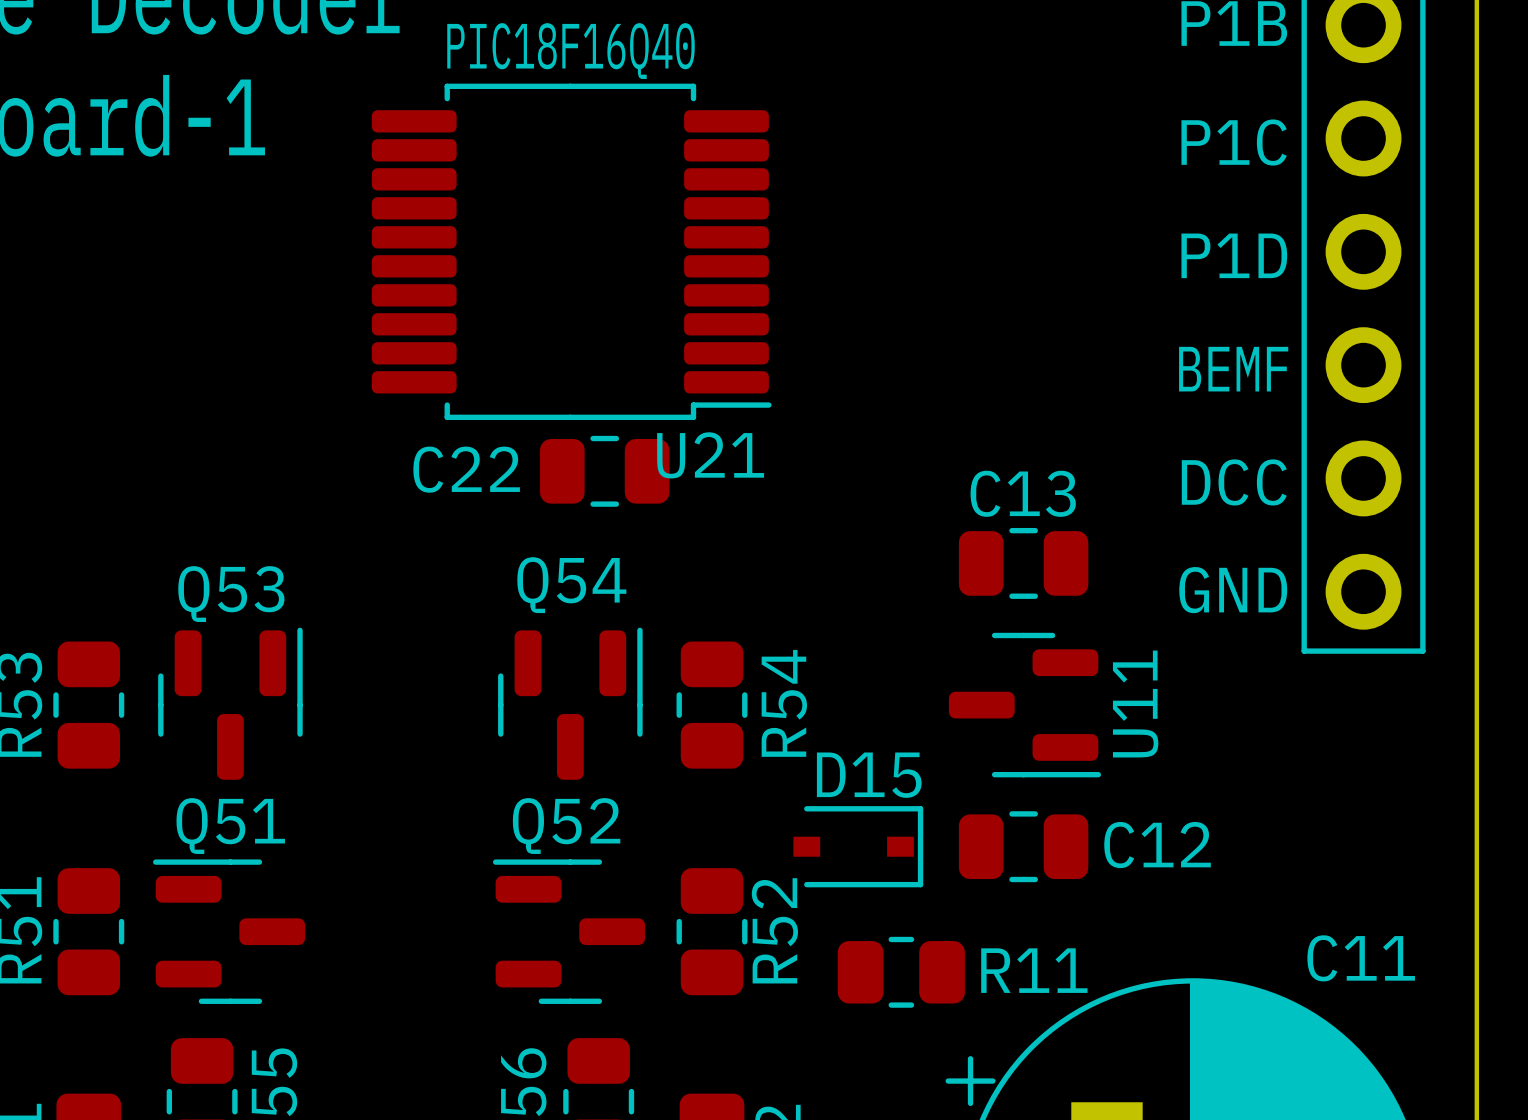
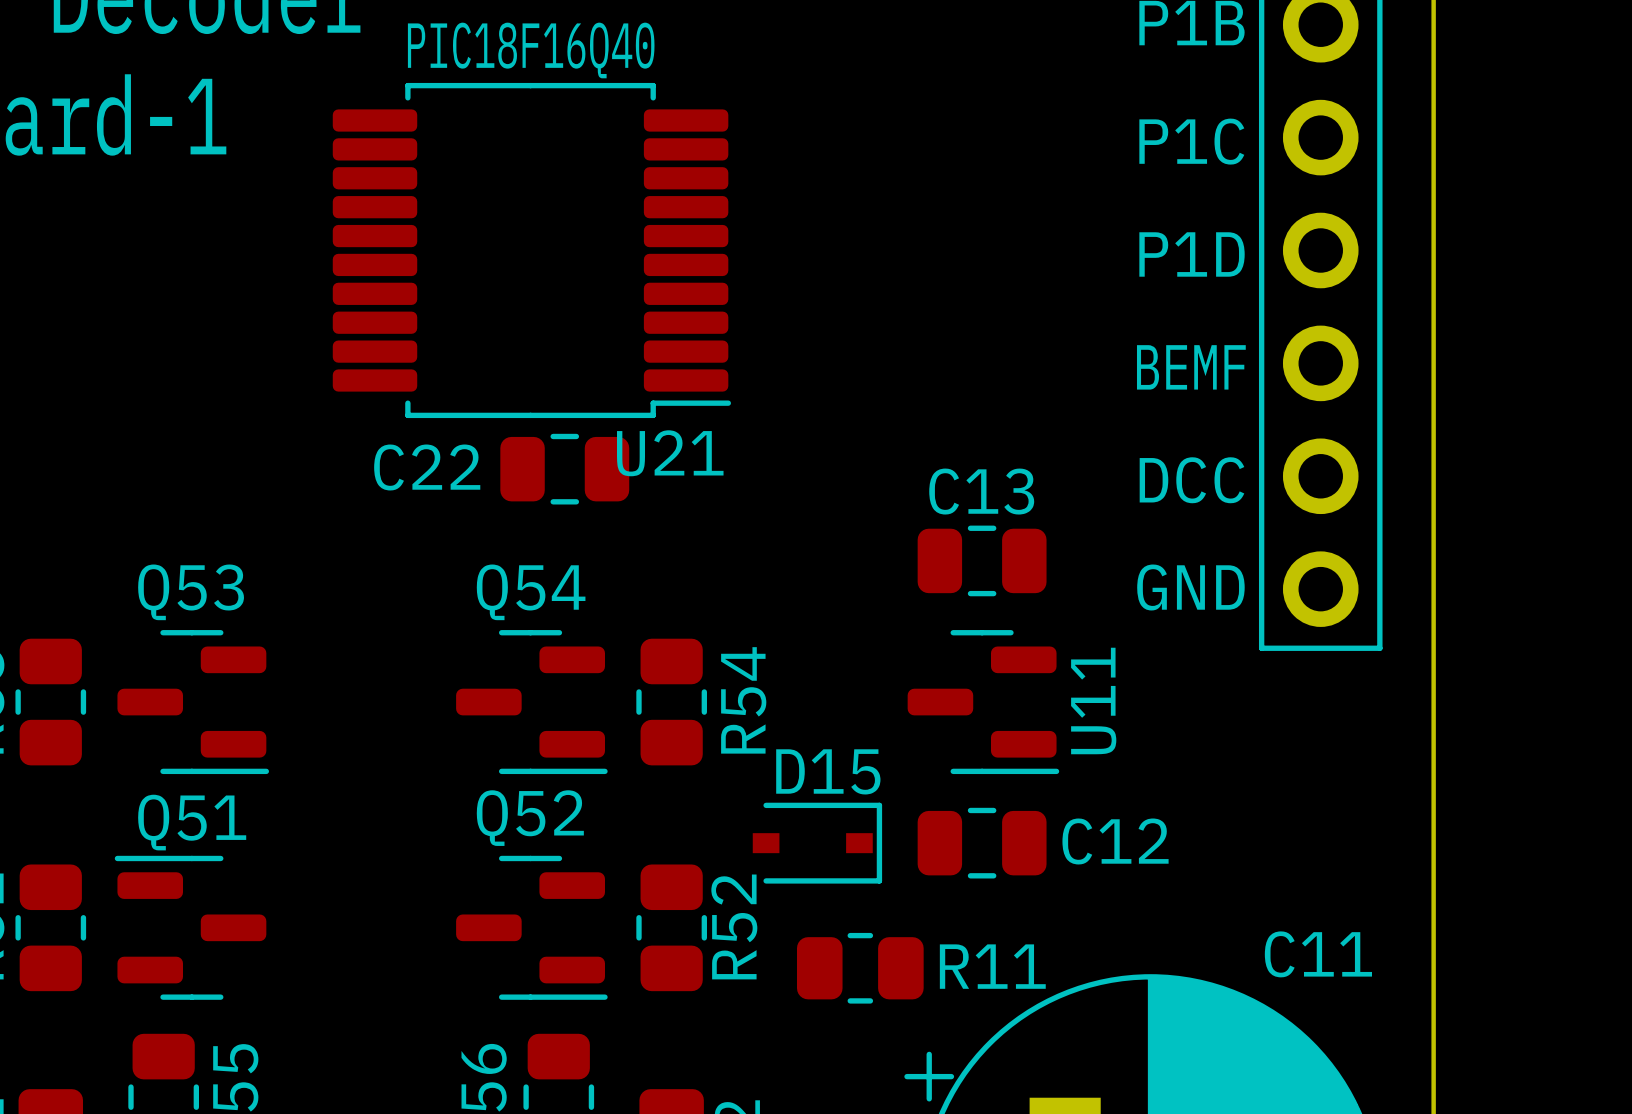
Q53 rotation: 0° (230, 703) -> 90° clockwise (193, 702)
Q54 rotation: 0° (570, 703) -> 90° clockwise (531, 702)
Q52 rotation: 0° (569, 931) -> 180° (531, 927)

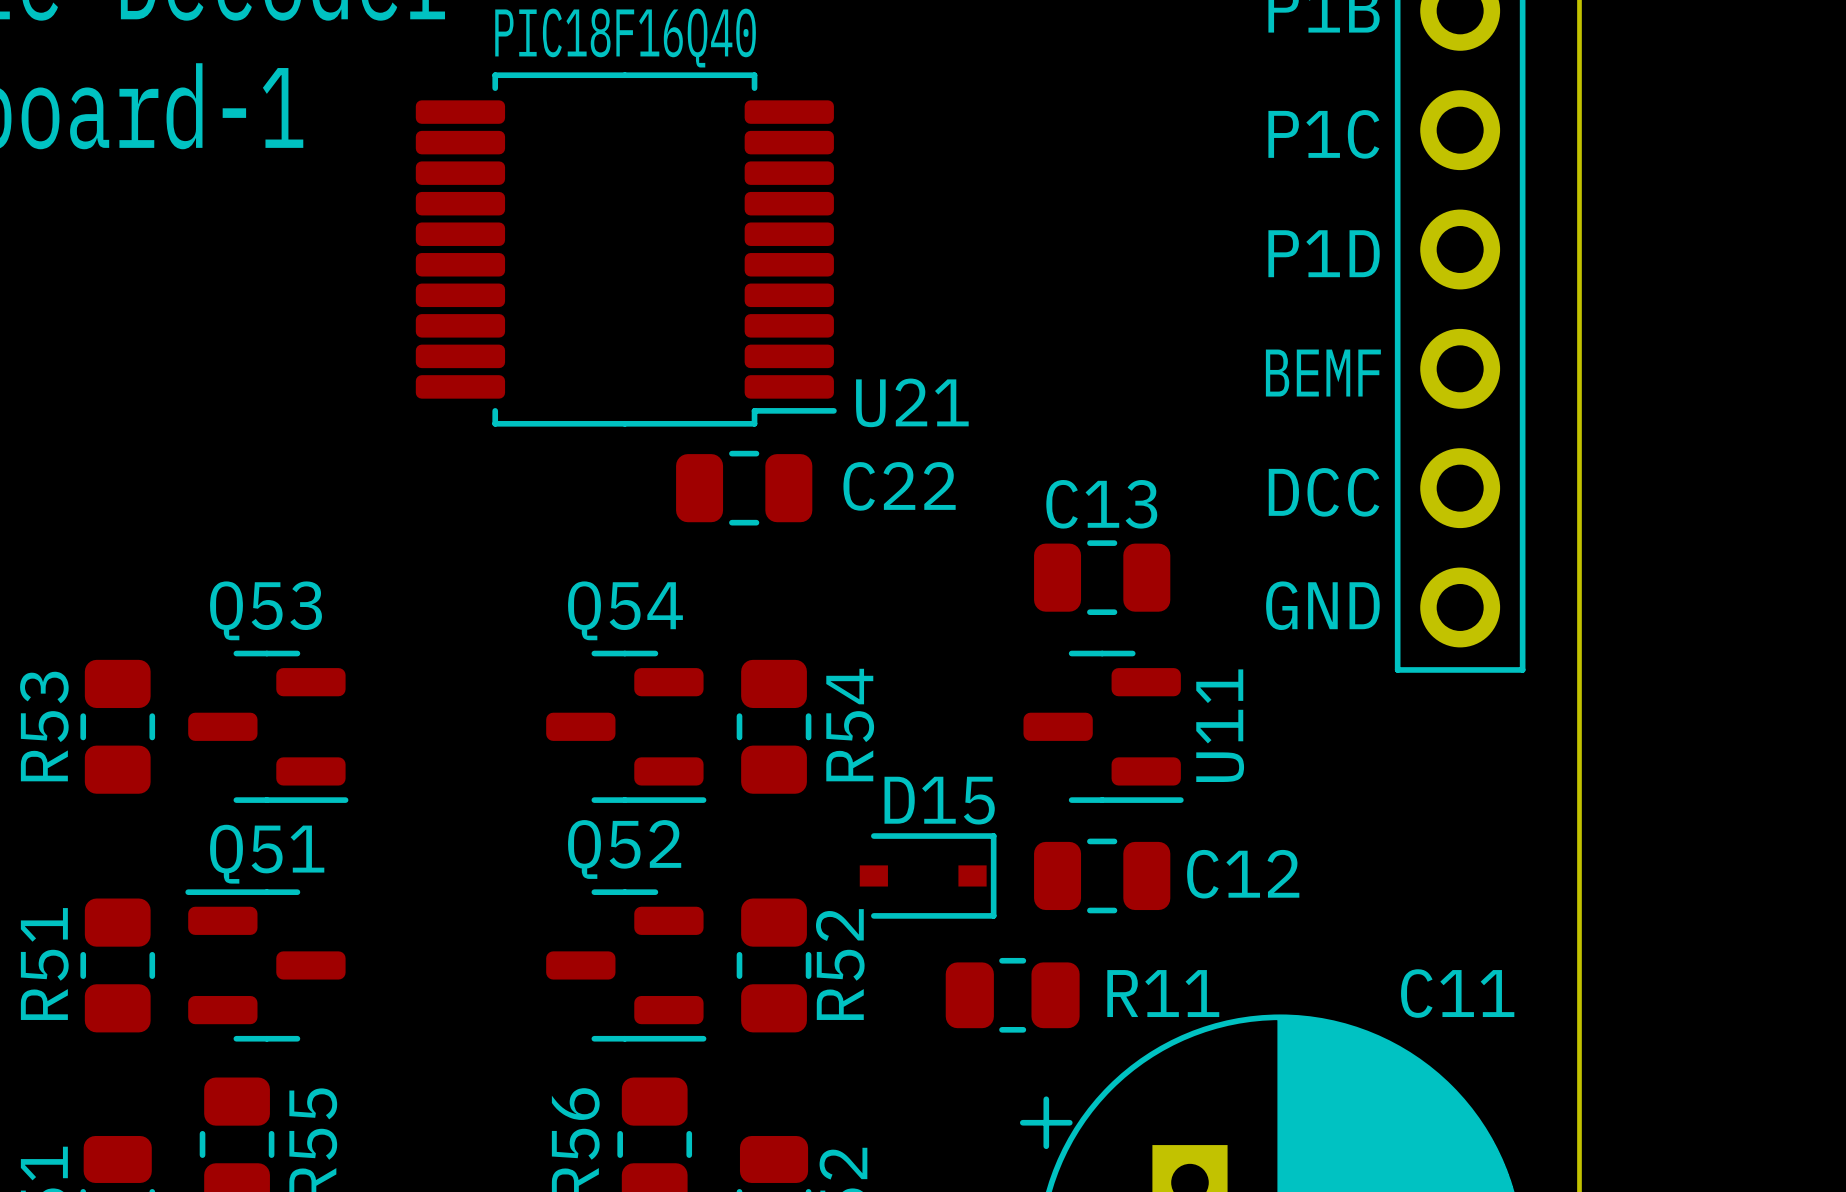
U21 name position: U21 (670, 453) -> U21 (912, 402)
C22 name position: C22 (427, 467) -> C22 (899, 486)
C22 position: (564, 469) -> (744, 488)
R11 name position: R11 (992, 966) -> R11 (1163, 993)
R11 position: (860, 968) -> (1012, 995)

